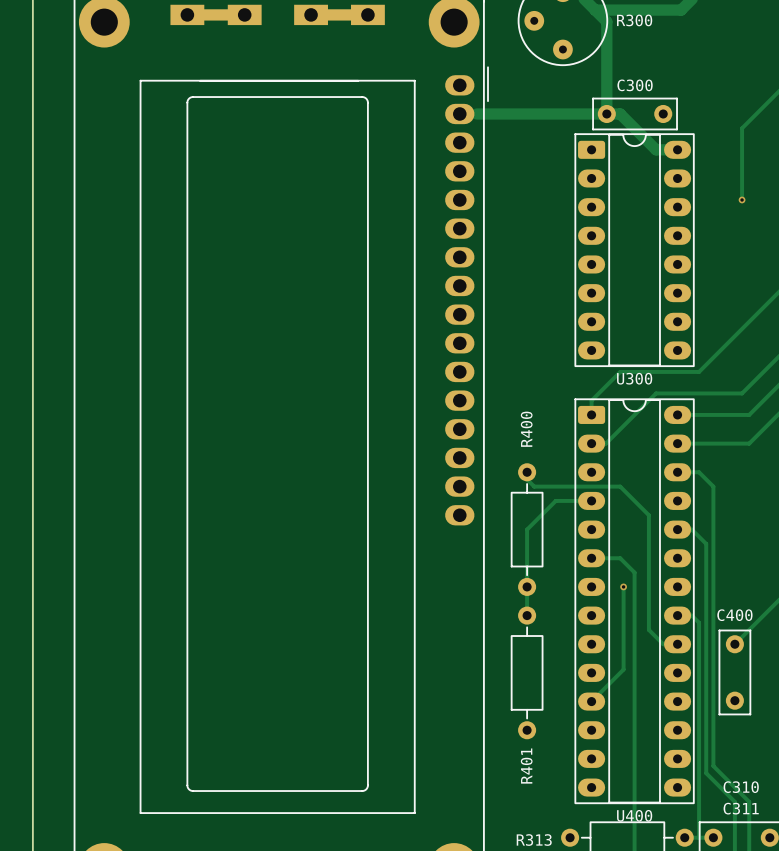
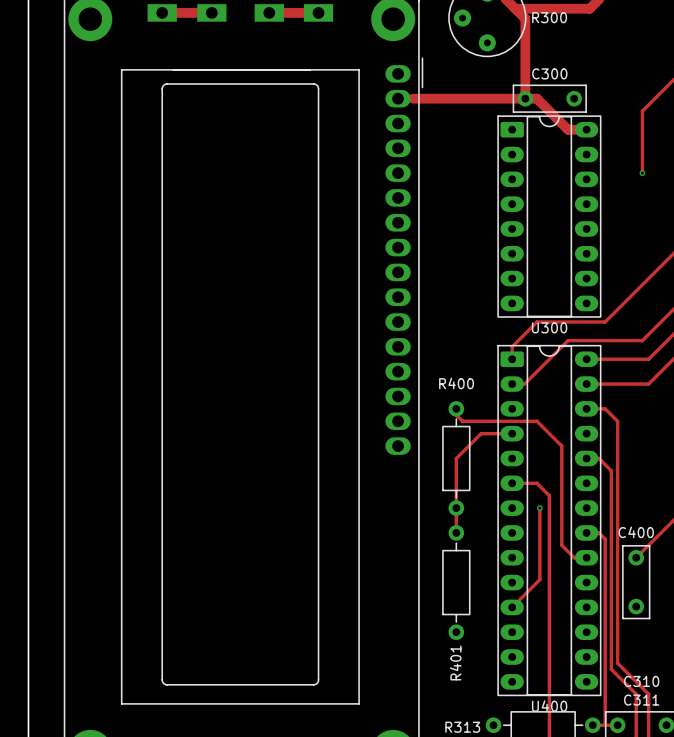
R400 name rotation: 0° (526, 429) -> 90° clockwise (456, 383)

